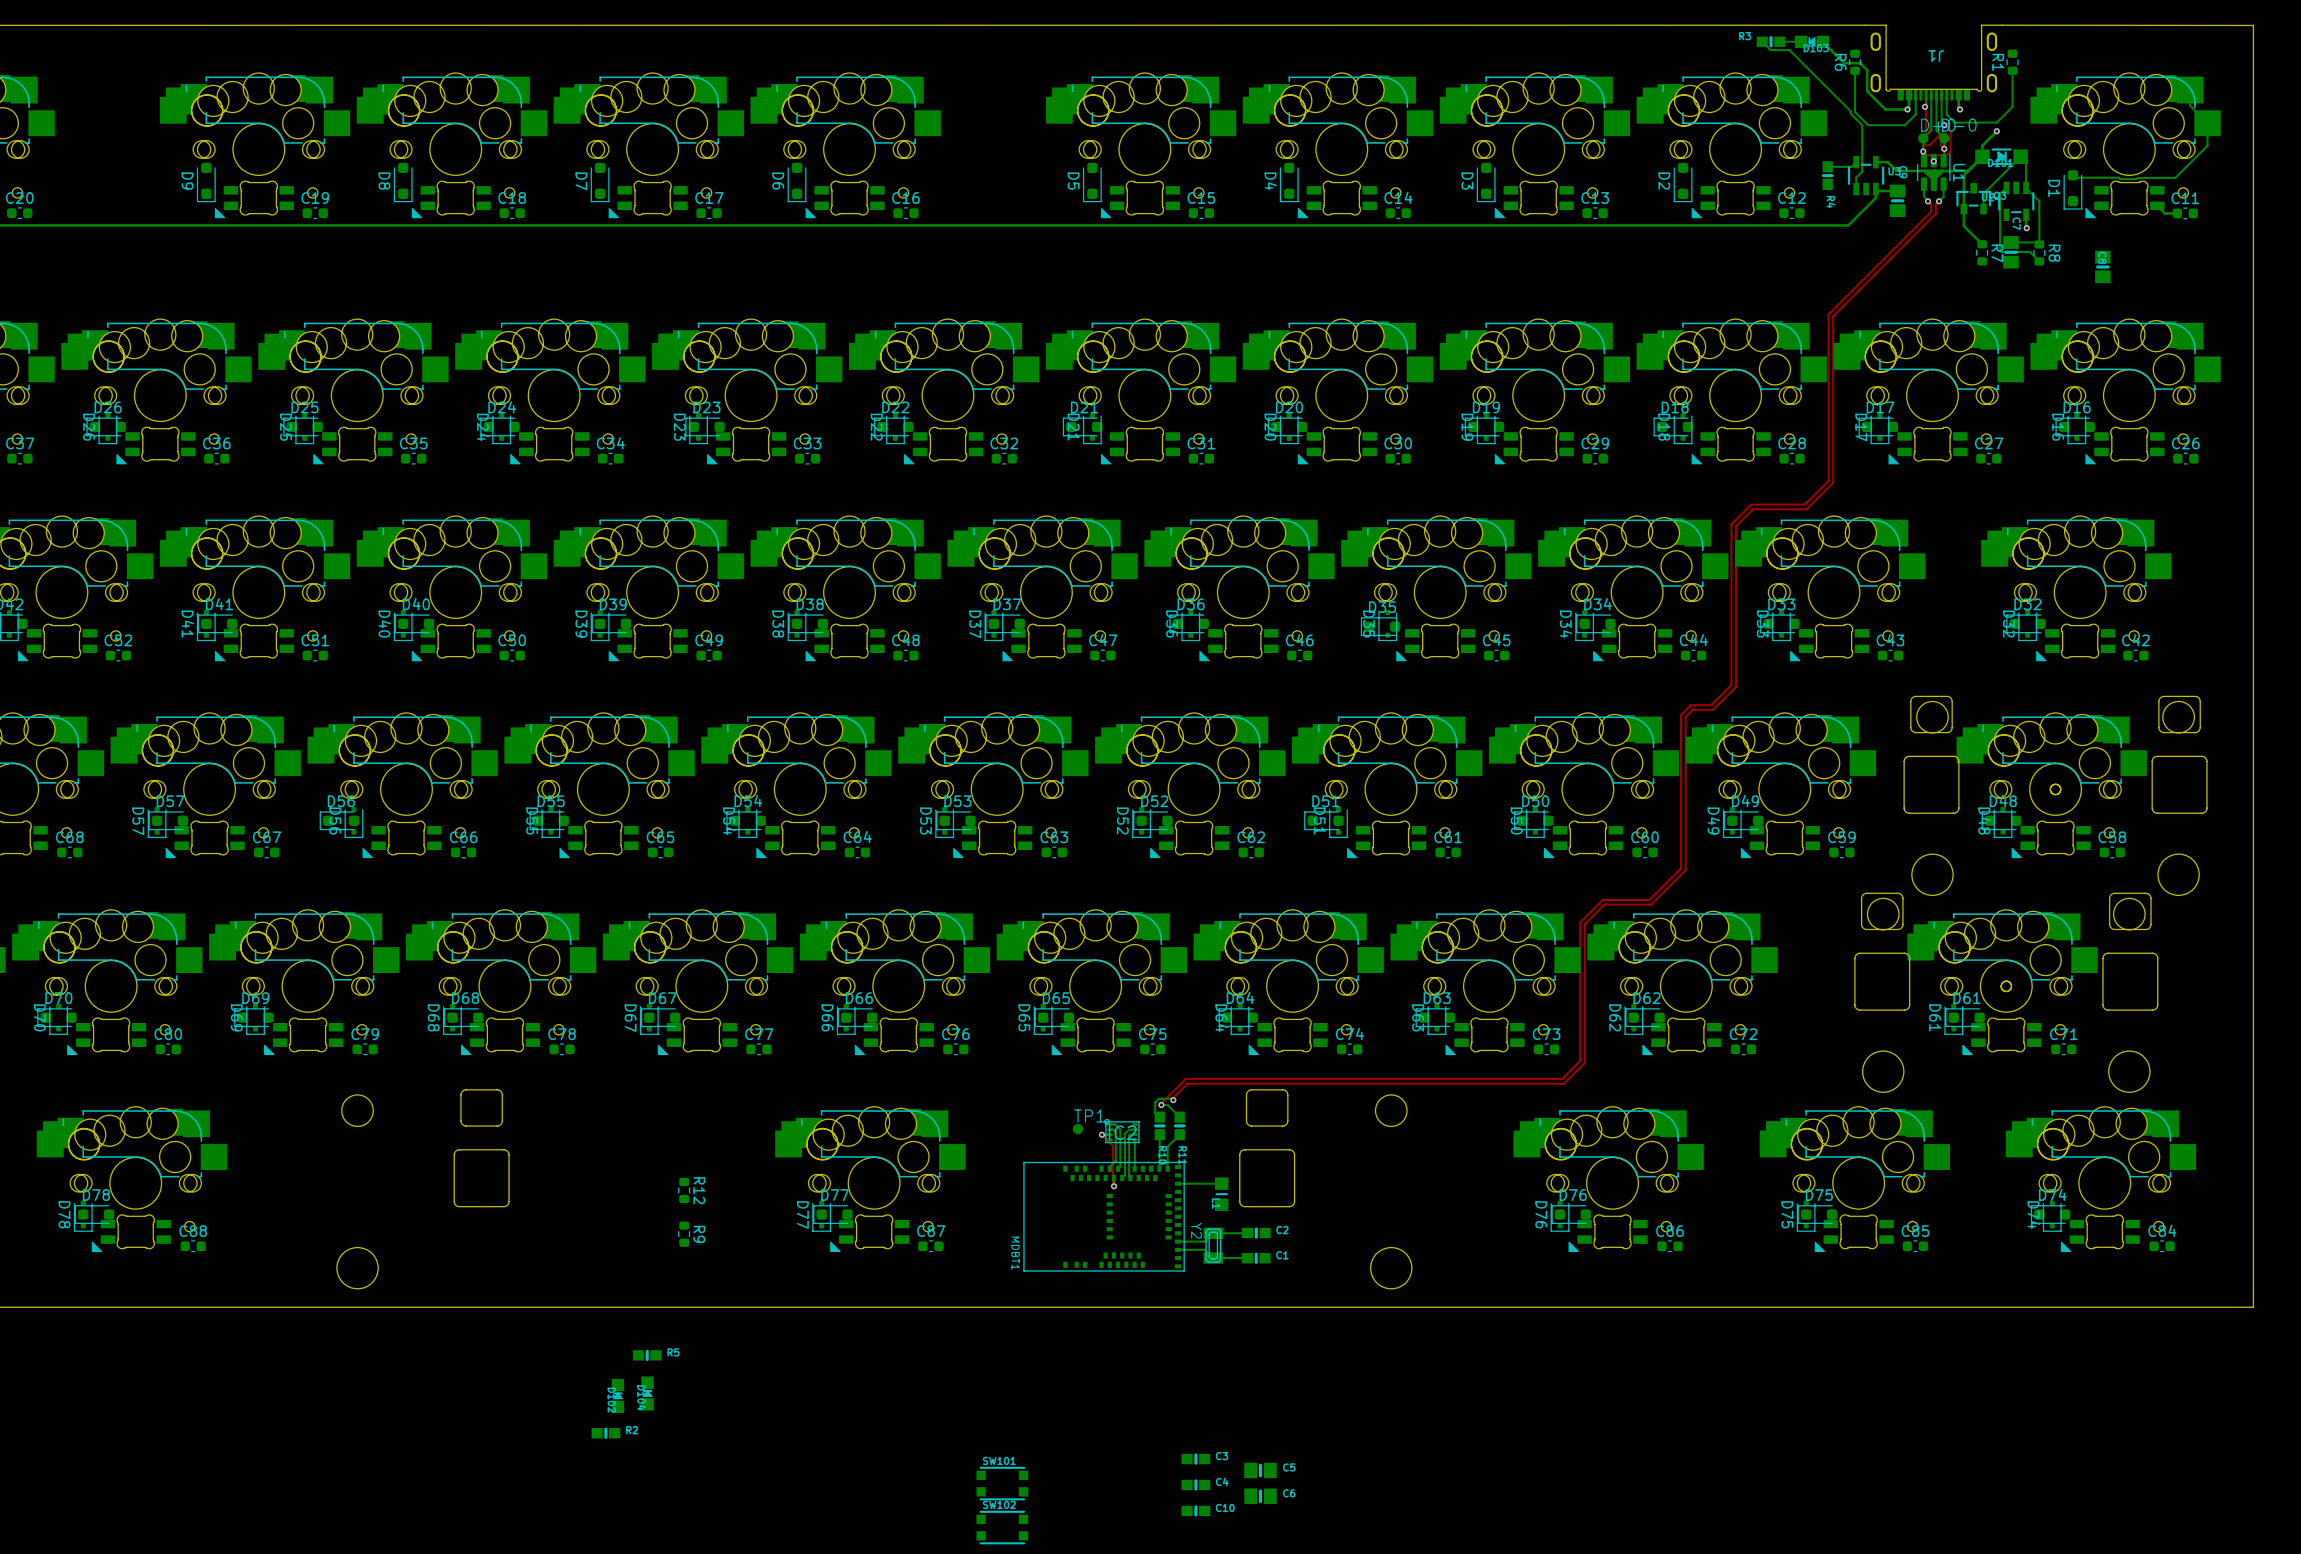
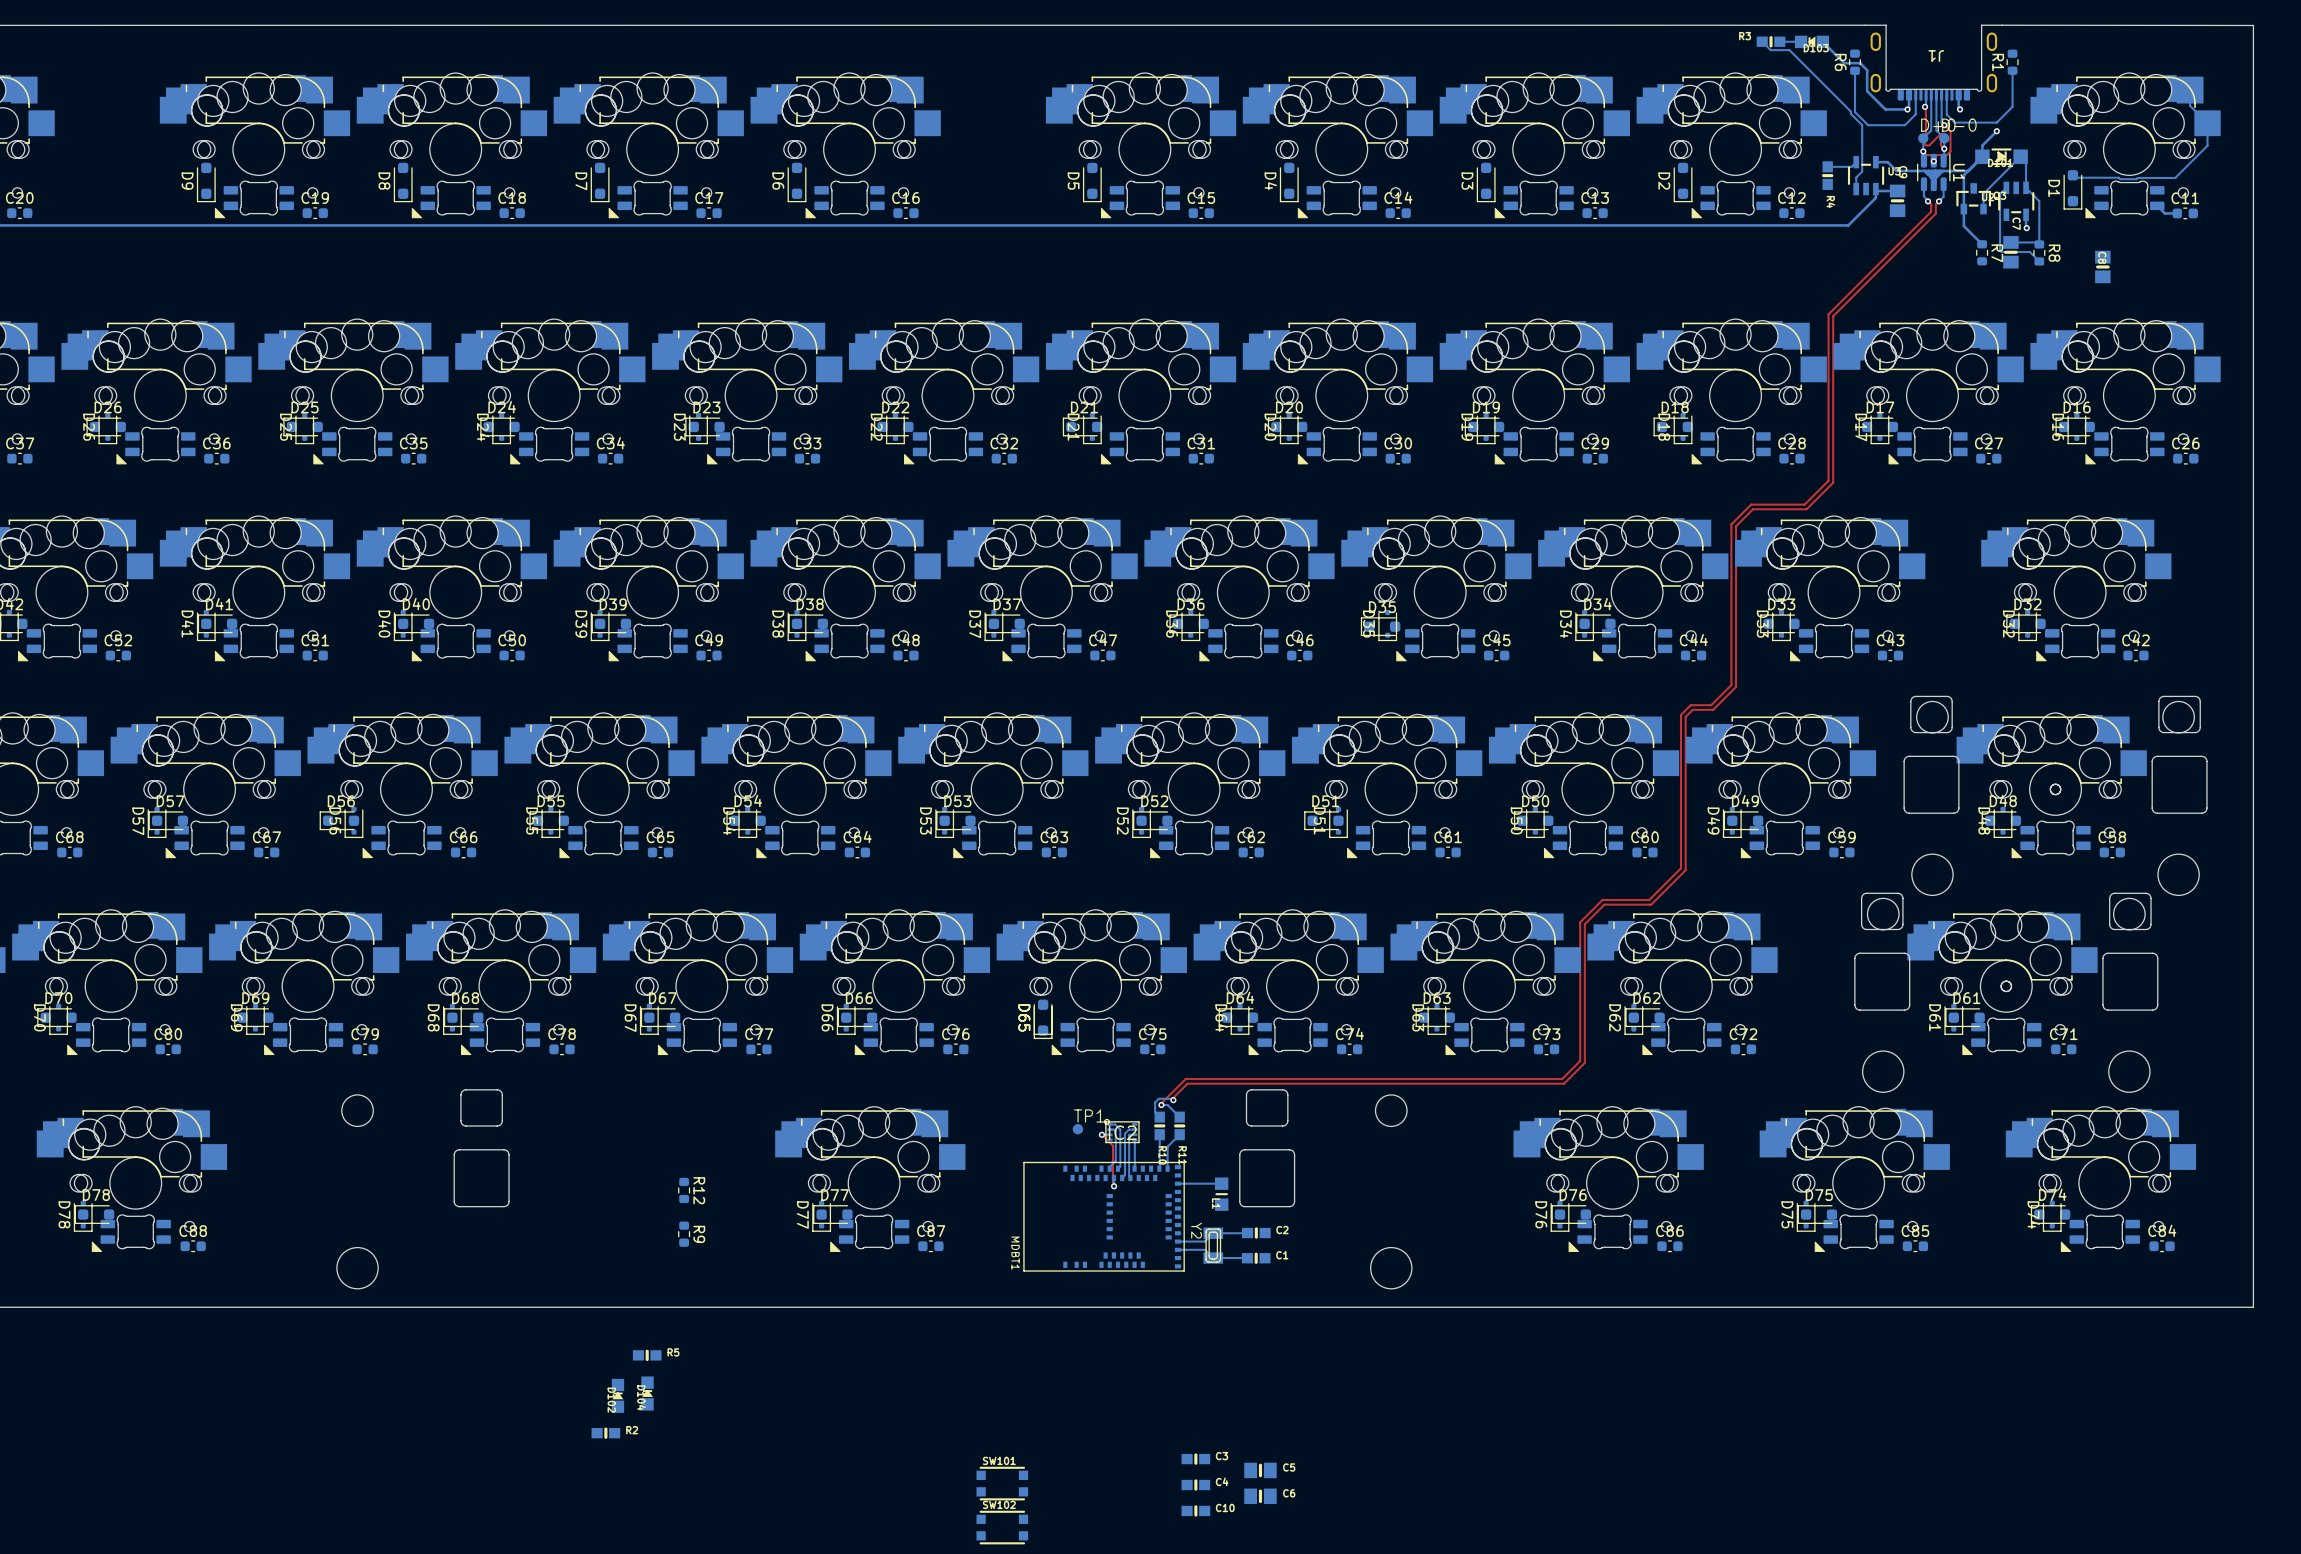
D65 rotation: 0° (1054, 1017) -> 90° counterclockwise (1043, 1019)

